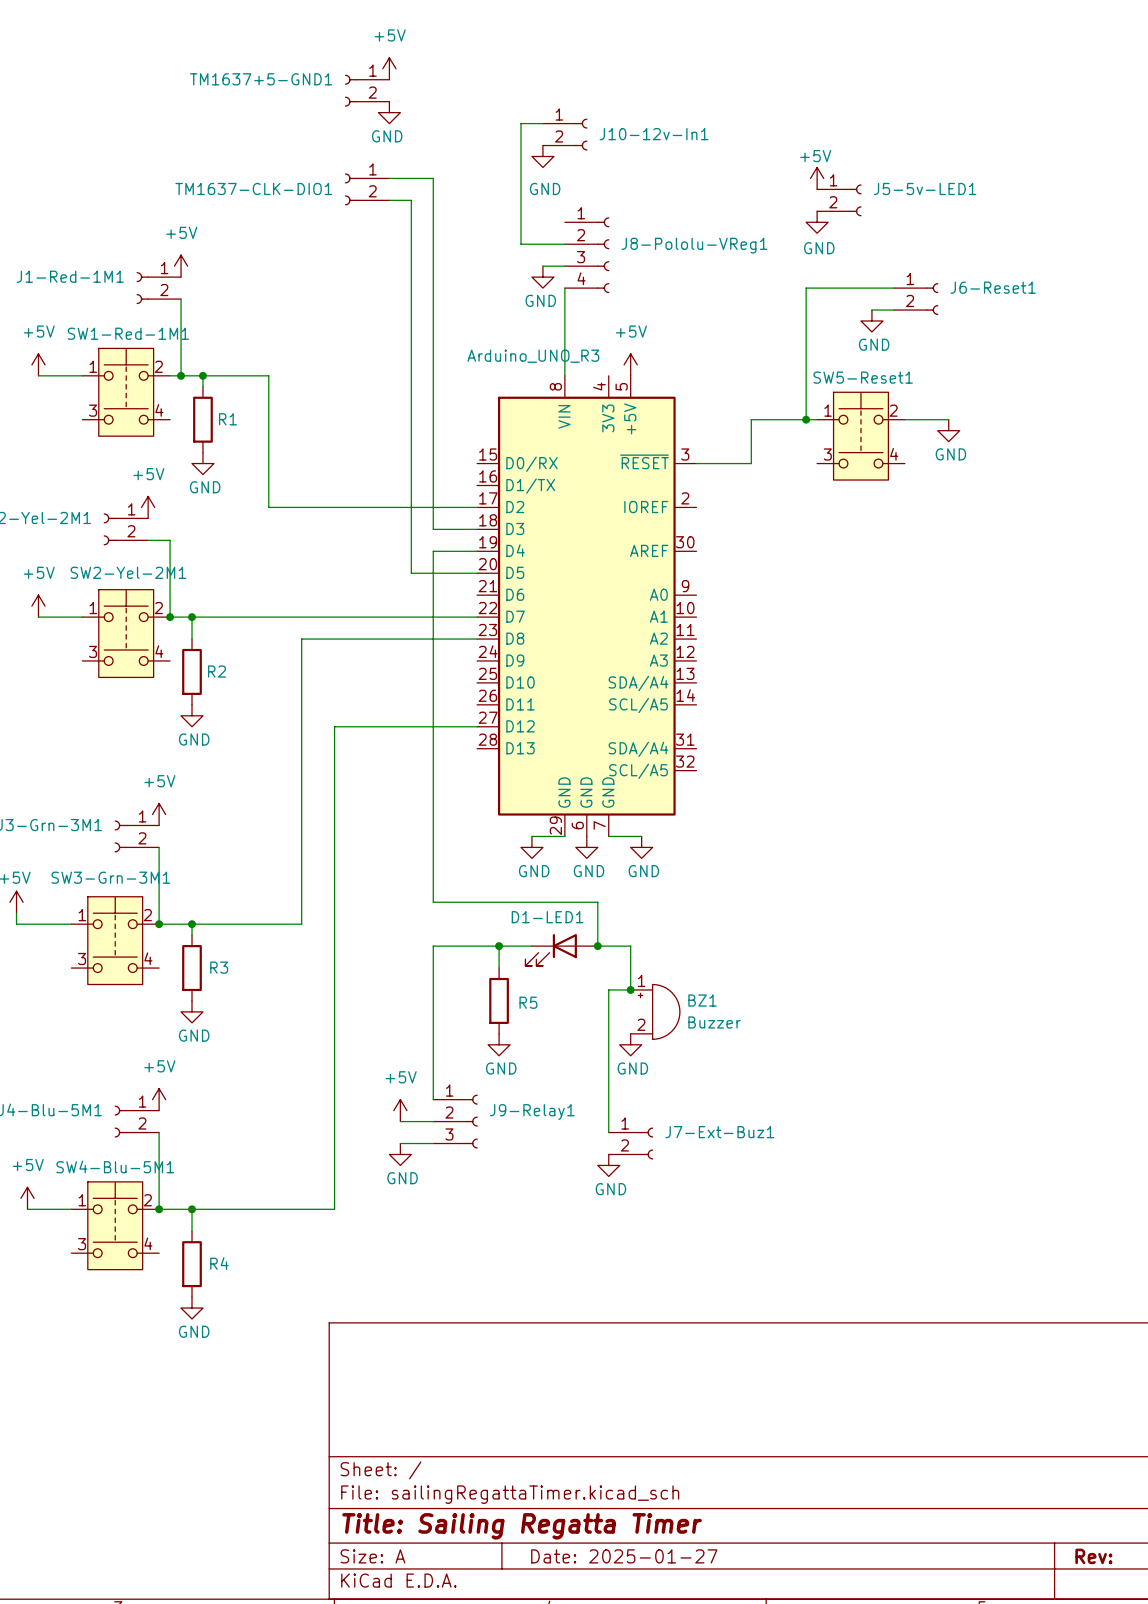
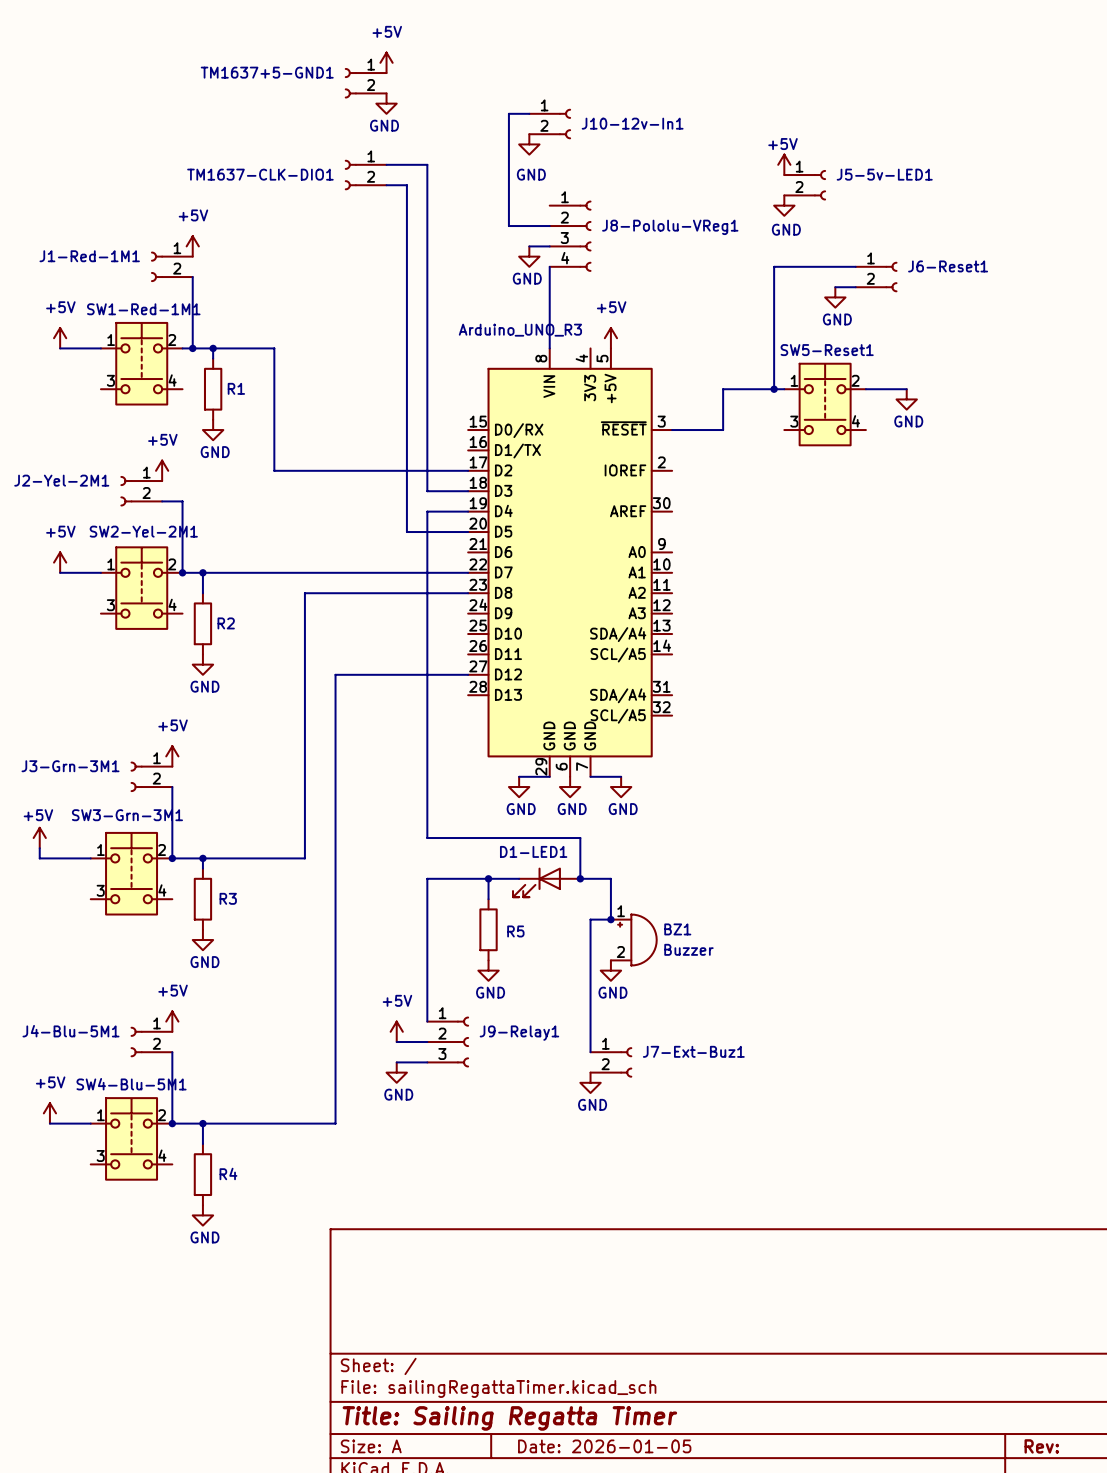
title block: Date: 2025-01-27 (624, 1556) -> Date: 2026-01-05 (604, 1446)

